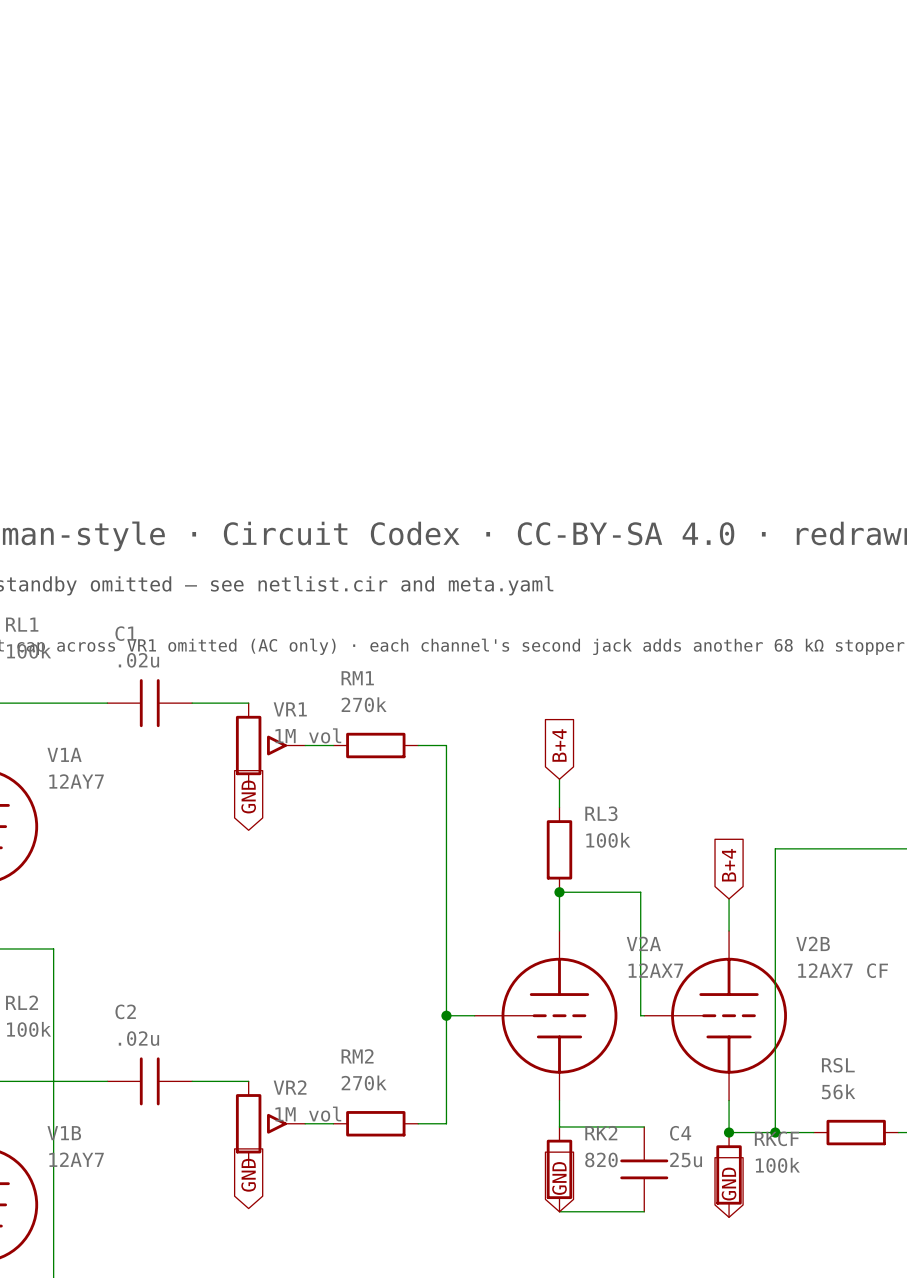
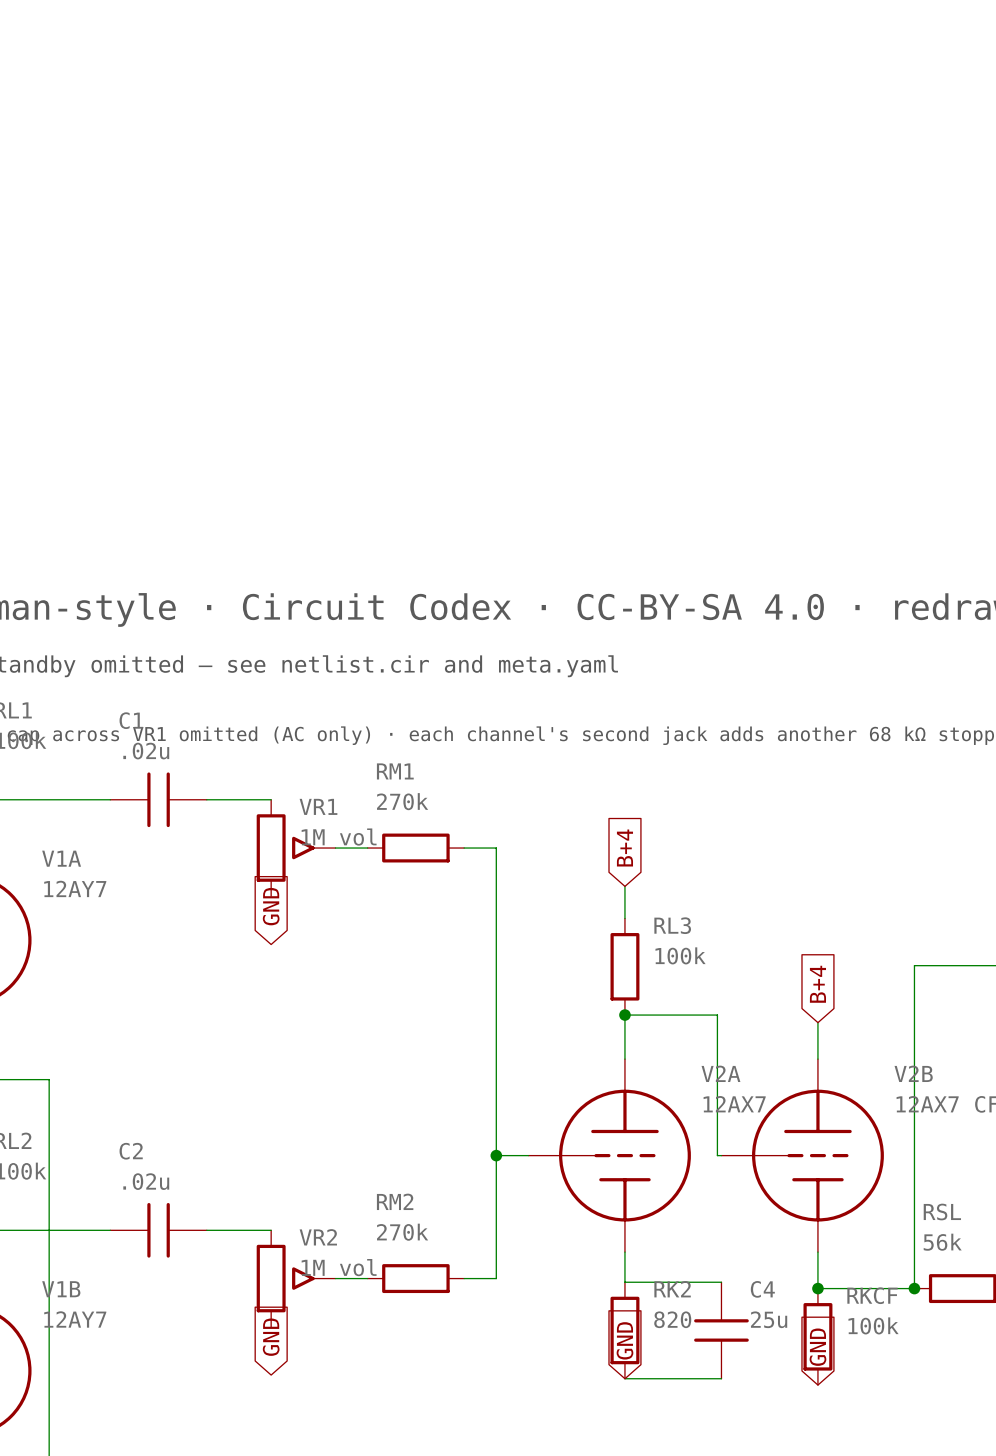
wire: (813, 848) (775, 848) (775, 1132) -> (914, 965) (914, 1288)
junction position: (775, 1132) -> (914, 1288)

